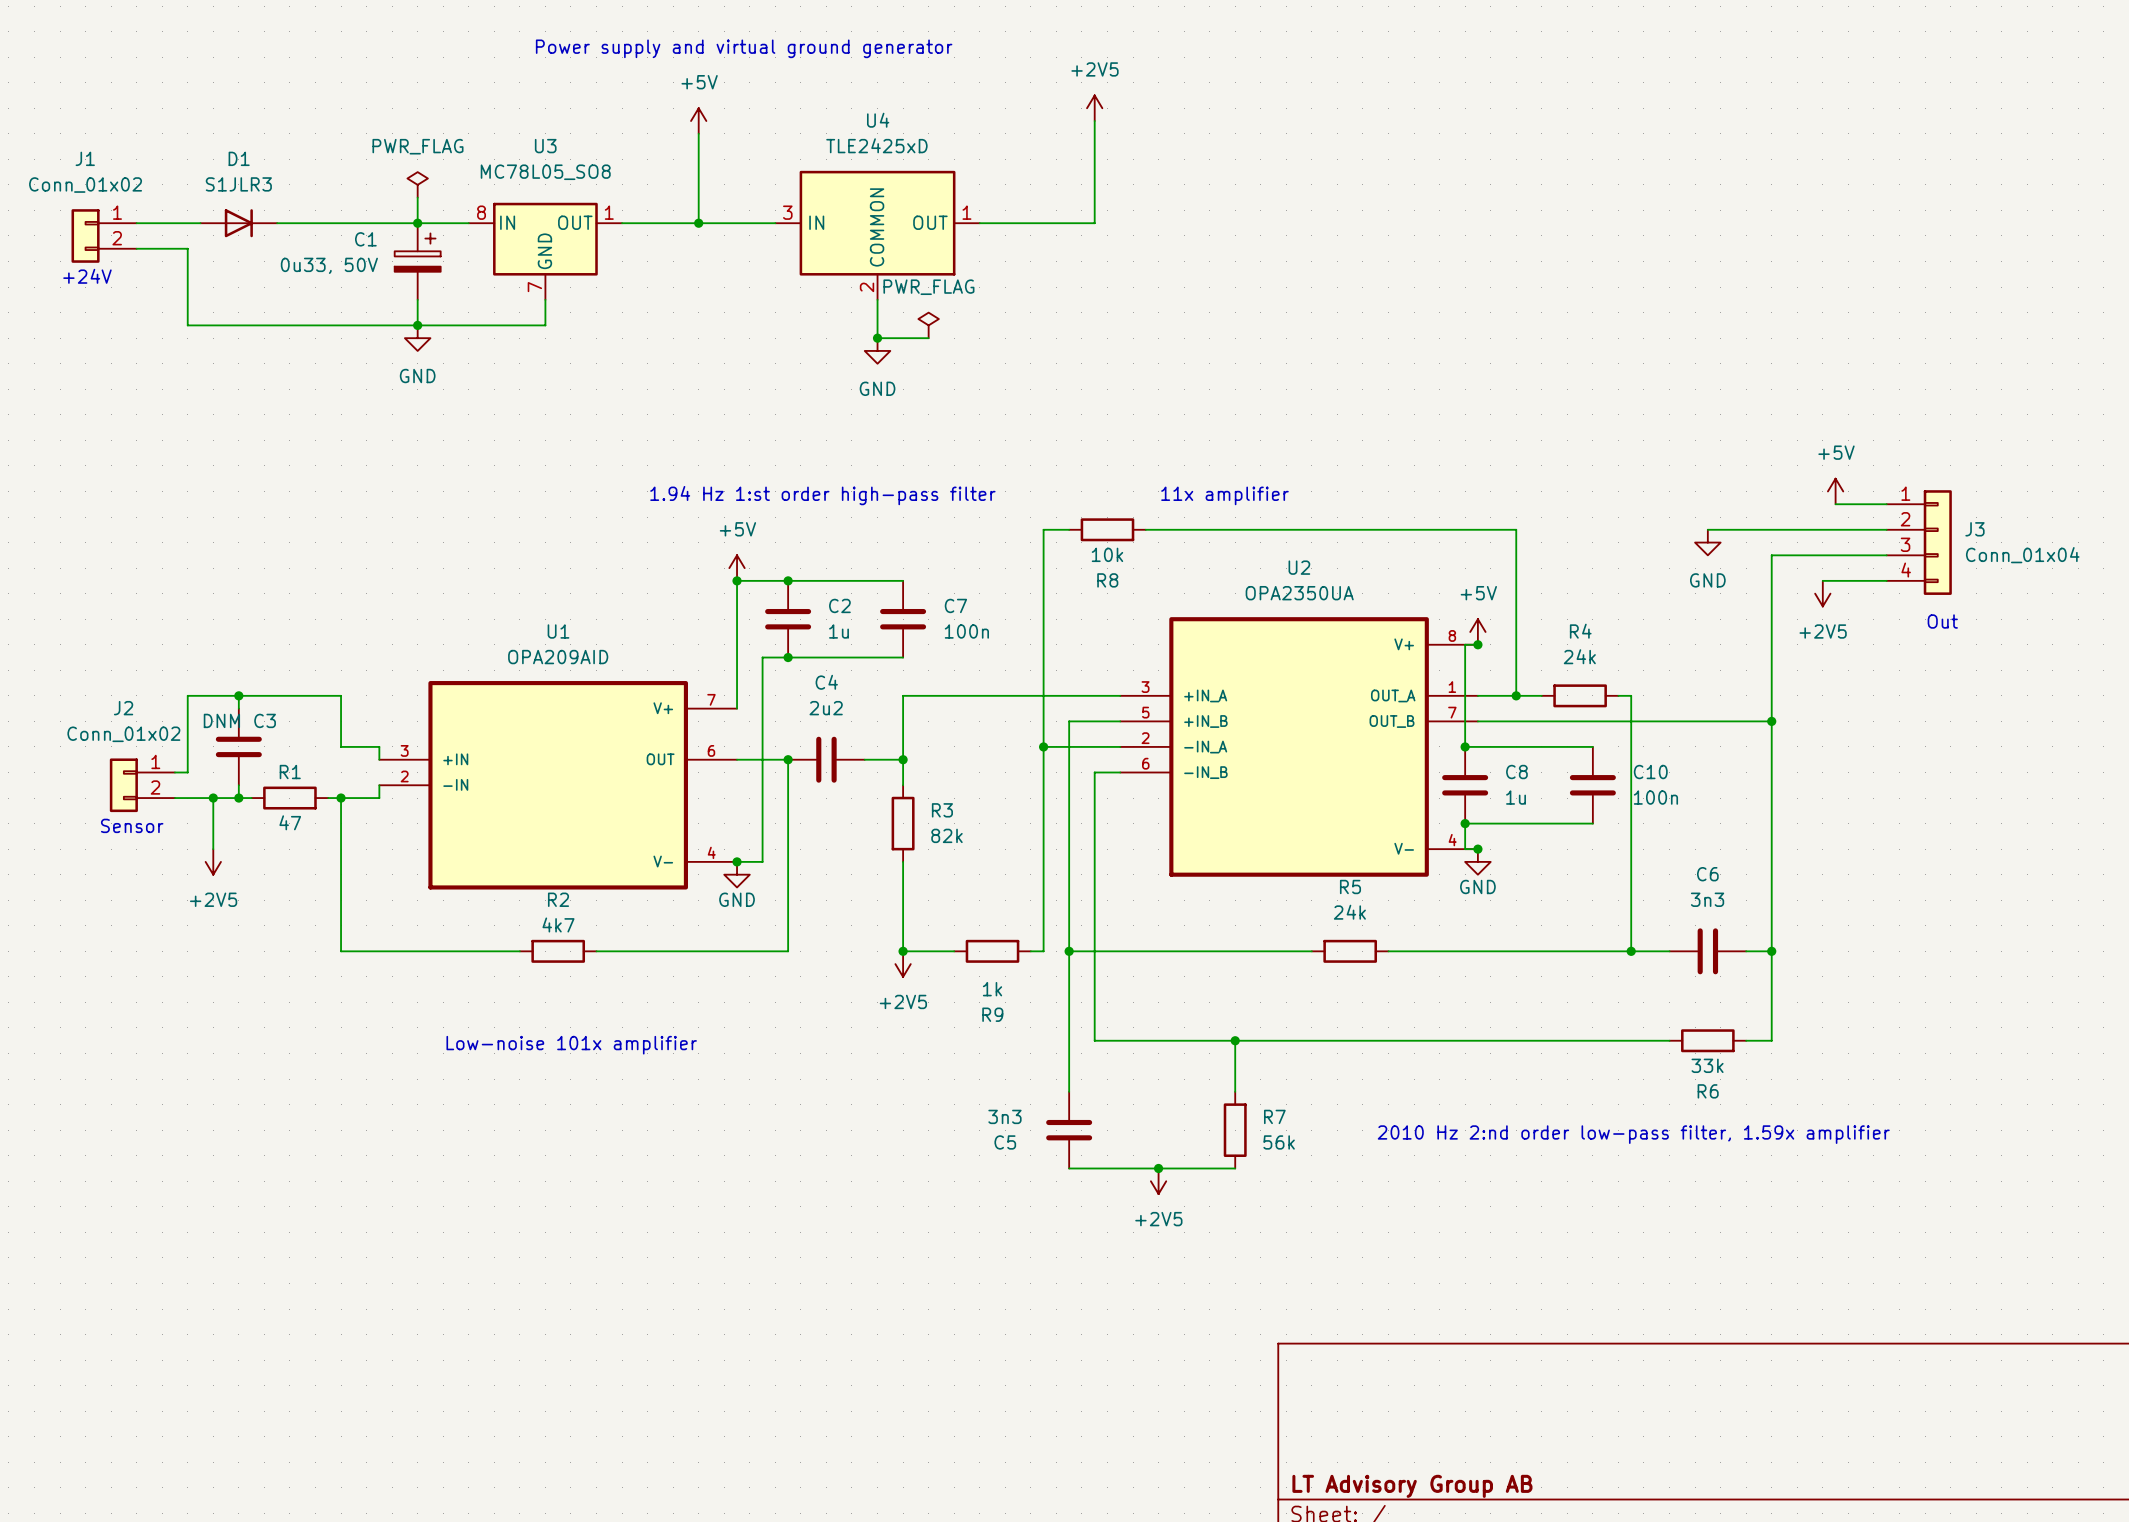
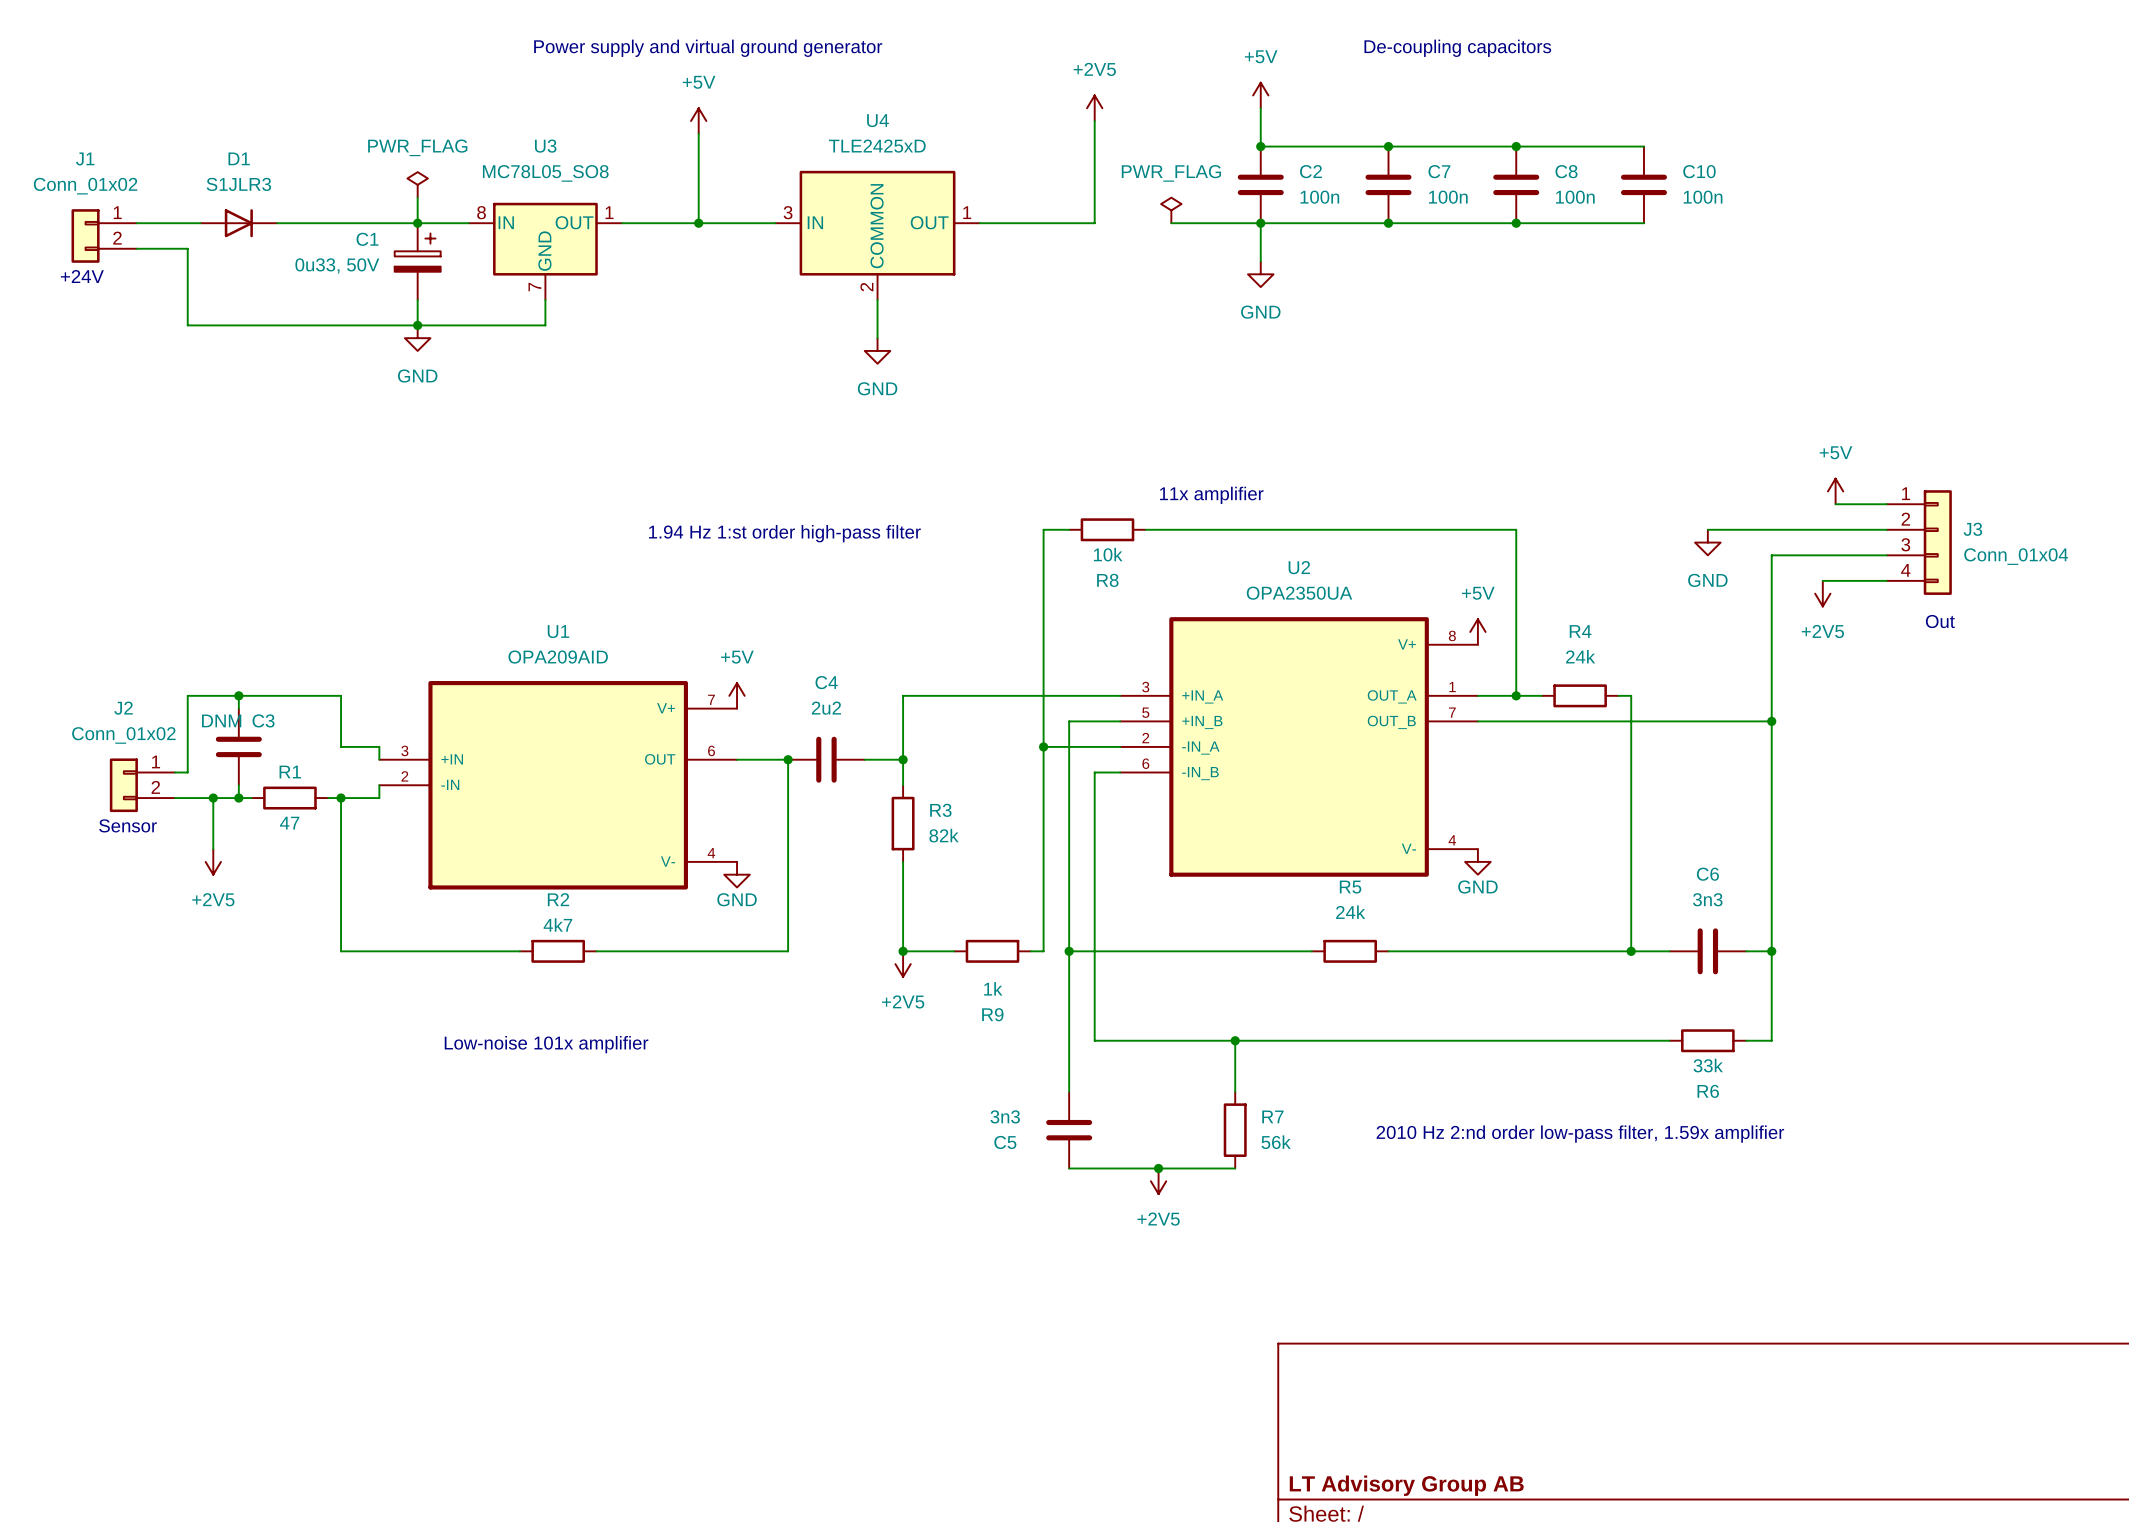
text: none -> De-coupling capacitors (1457, 48)
power symbol: none -> +5V (1260, 95)
wire: none -> (1260, 108) (1260, 146) (1643, 146)
junction: none -> (1260, 146)
junction: none -> (1388, 146)
junction: none -> (1516, 146)
power symbol: none -> PWR_FLAG (1171, 210)
wire: none -> (1171, 223) (1643, 223)
wire: none -> (1260, 223) (1260, 261)
junction: none -> (1260, 223)
junction: none -> (1388, 223)
junction: none -> (1516, 223)
power symbol: none -> GND (1260, 274)
power symbol: PWR_FLAG (928, 325) -> none
wire: (877, 338) (928, 338) -> none
junction: (877, 338) -> none
text position: 1.94 Hz 1:st order high-pass filter (822, 495) -> 1.94 Hz 1:st order high-pass filter (784, 533)
power symbol position: +5V (737, 568) -> +5V (737, 695)
junction: (737, 580) -> none
junction: (788, 580) -> none
wire: (903, 580) (737, 580) (737, 708) -> none
C2 position: (788, 619) -> (1260, 184)
C7 position: (903, 619) -> (1388, 184)
C2 value: 1u (839, 631) -> 100n (1319, 197)
wire: (1477, 644) (1465, 644) (1465, 746) (1592, 746) -> none
junction: (1477, 644) -> none
junction: (788, 657) -> none
wire: (903, 657) (762, 657) (762, 861) (737, 861) -> none
junction: (1465, 746) -> none
C8 position: (1465, 785) -> (1516, 184)
C10 position: (1592, 785) -> (1643, 184)
C8 value: 1u (1516, 797) -> 100n (1575, 197)
junction: (1465, 823) -> none
wire: (1592, 823) (1465, 823) (1465, 849) (1477, 849) -> none
junction: (1477, 849) -> none
junction: (737, 861) -> none

